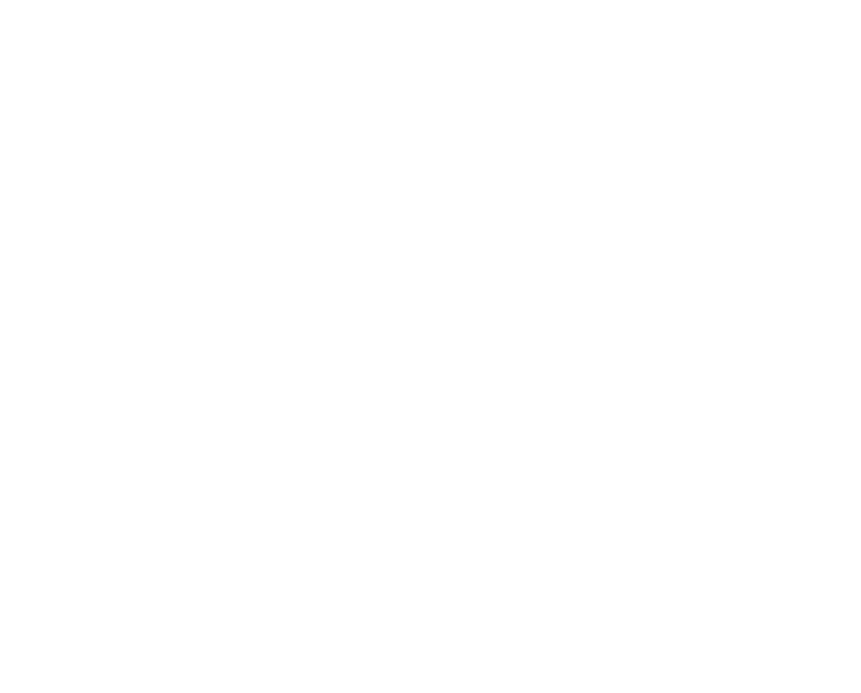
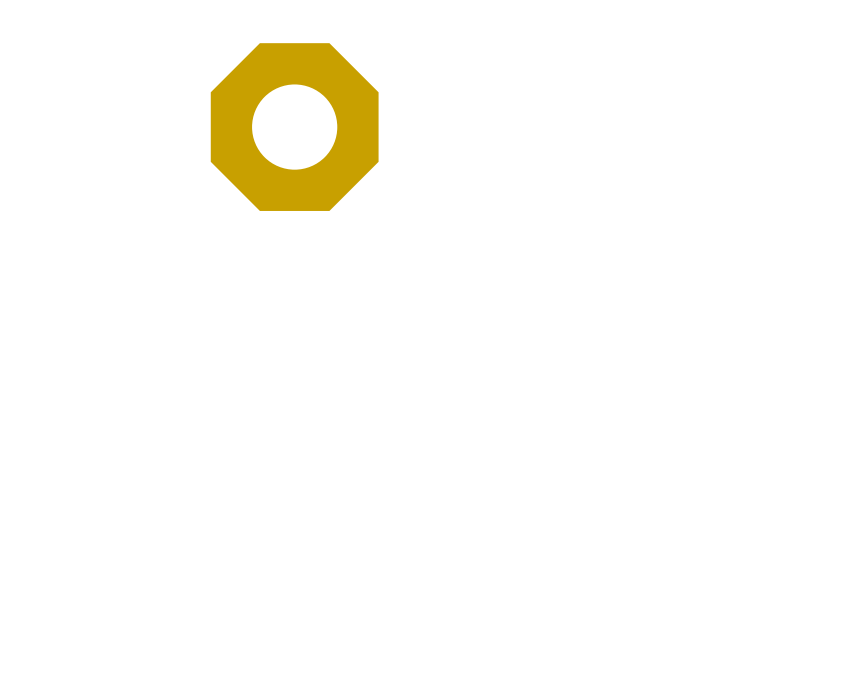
part: none -> (294, 127)

